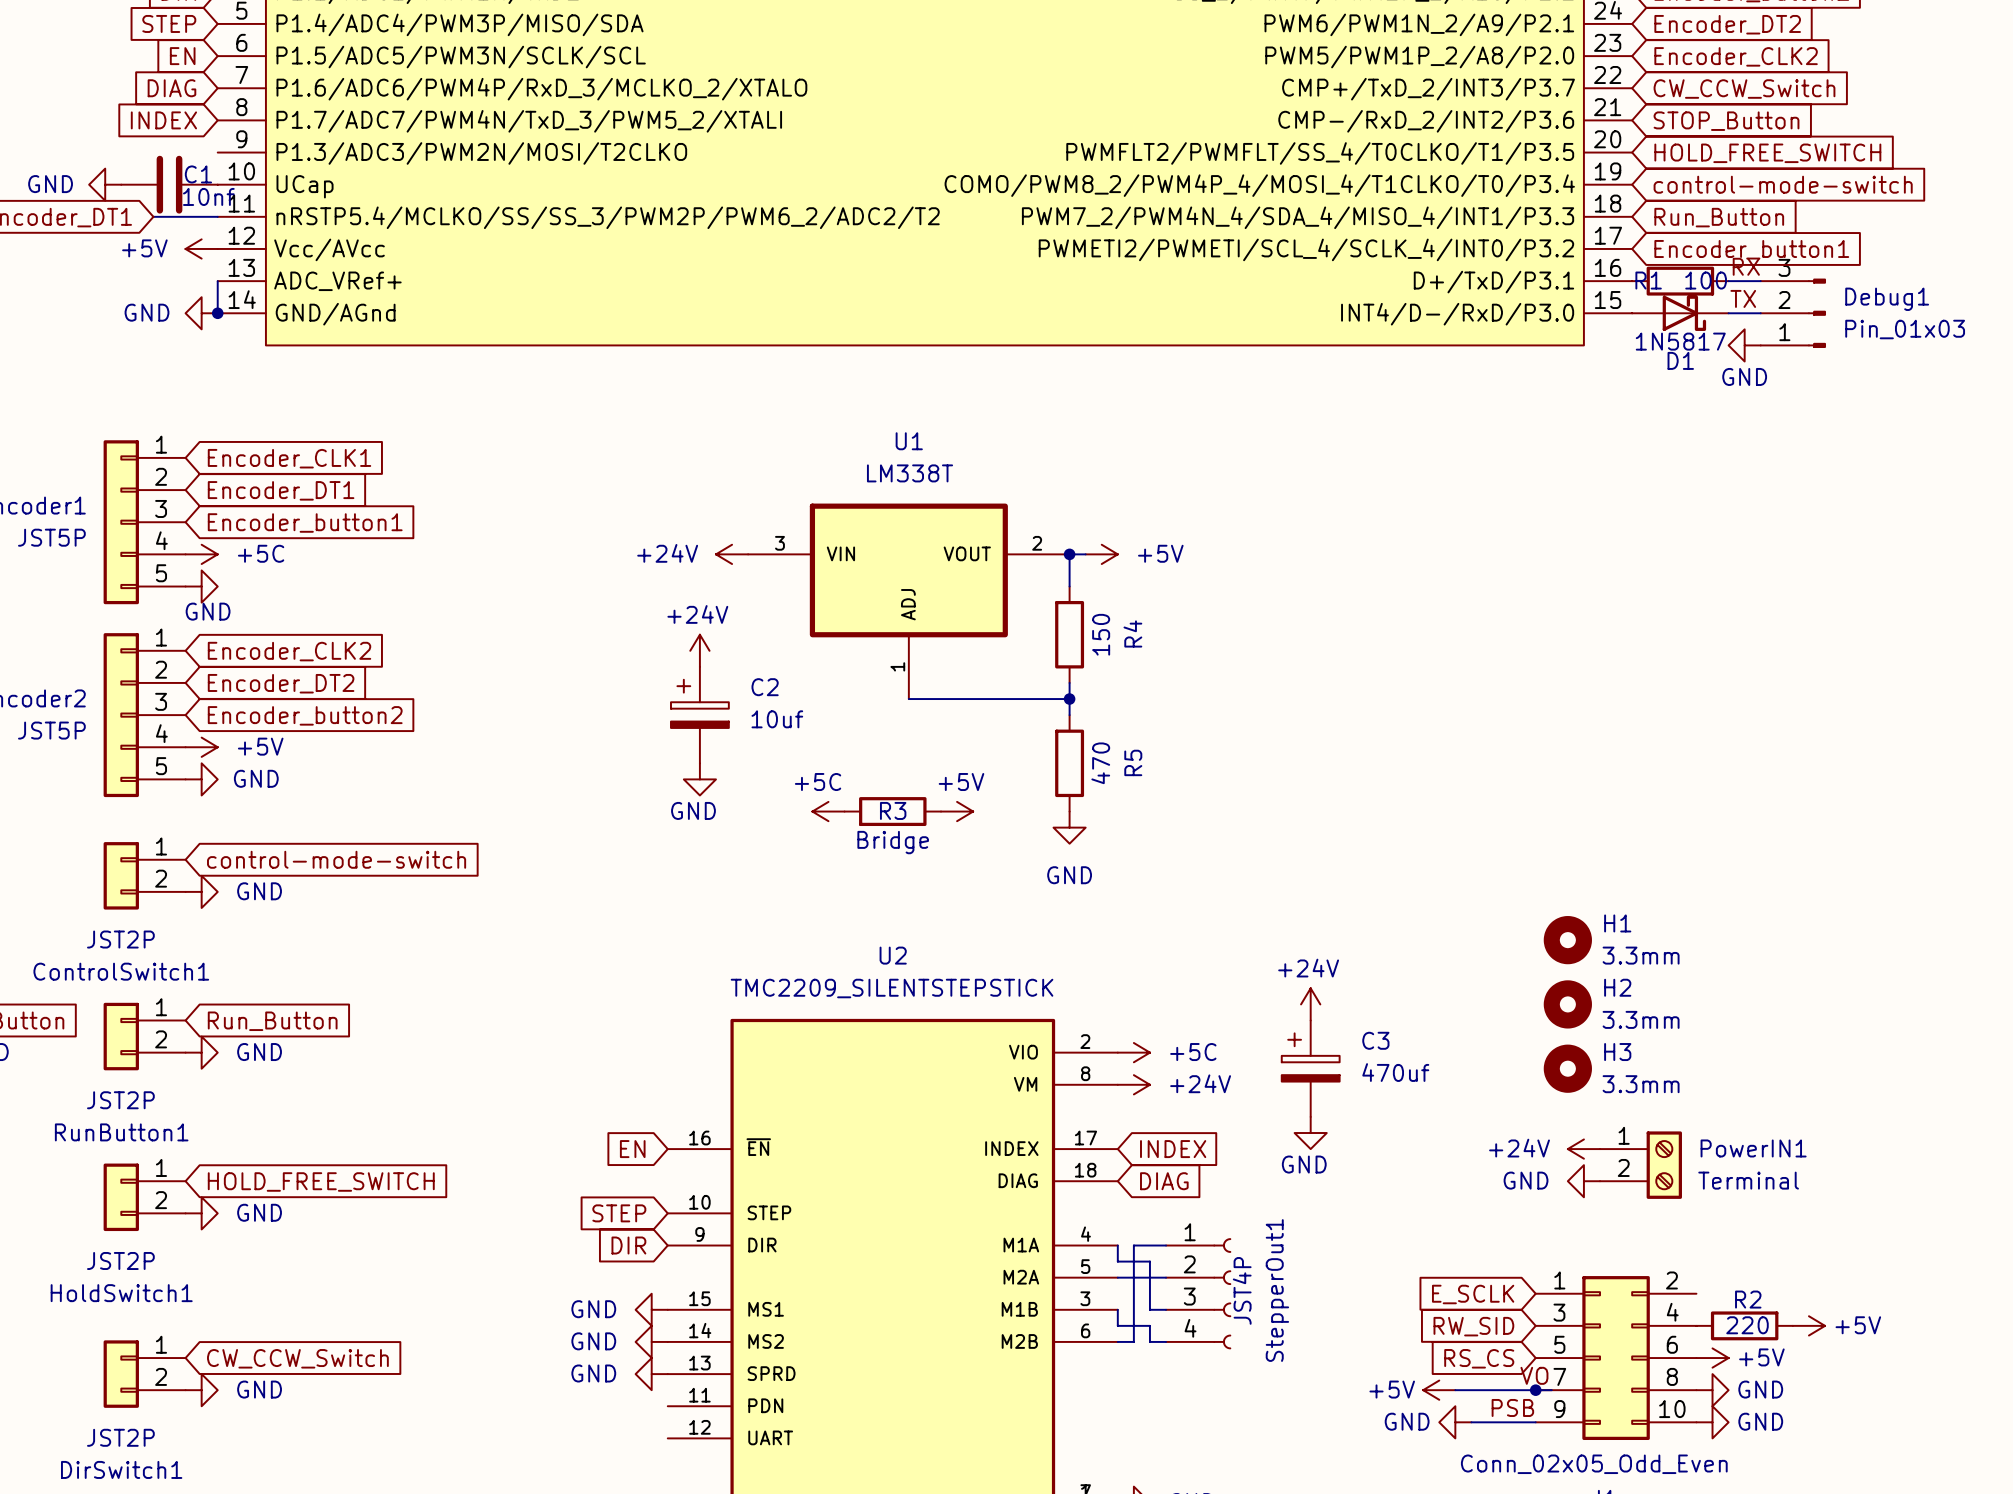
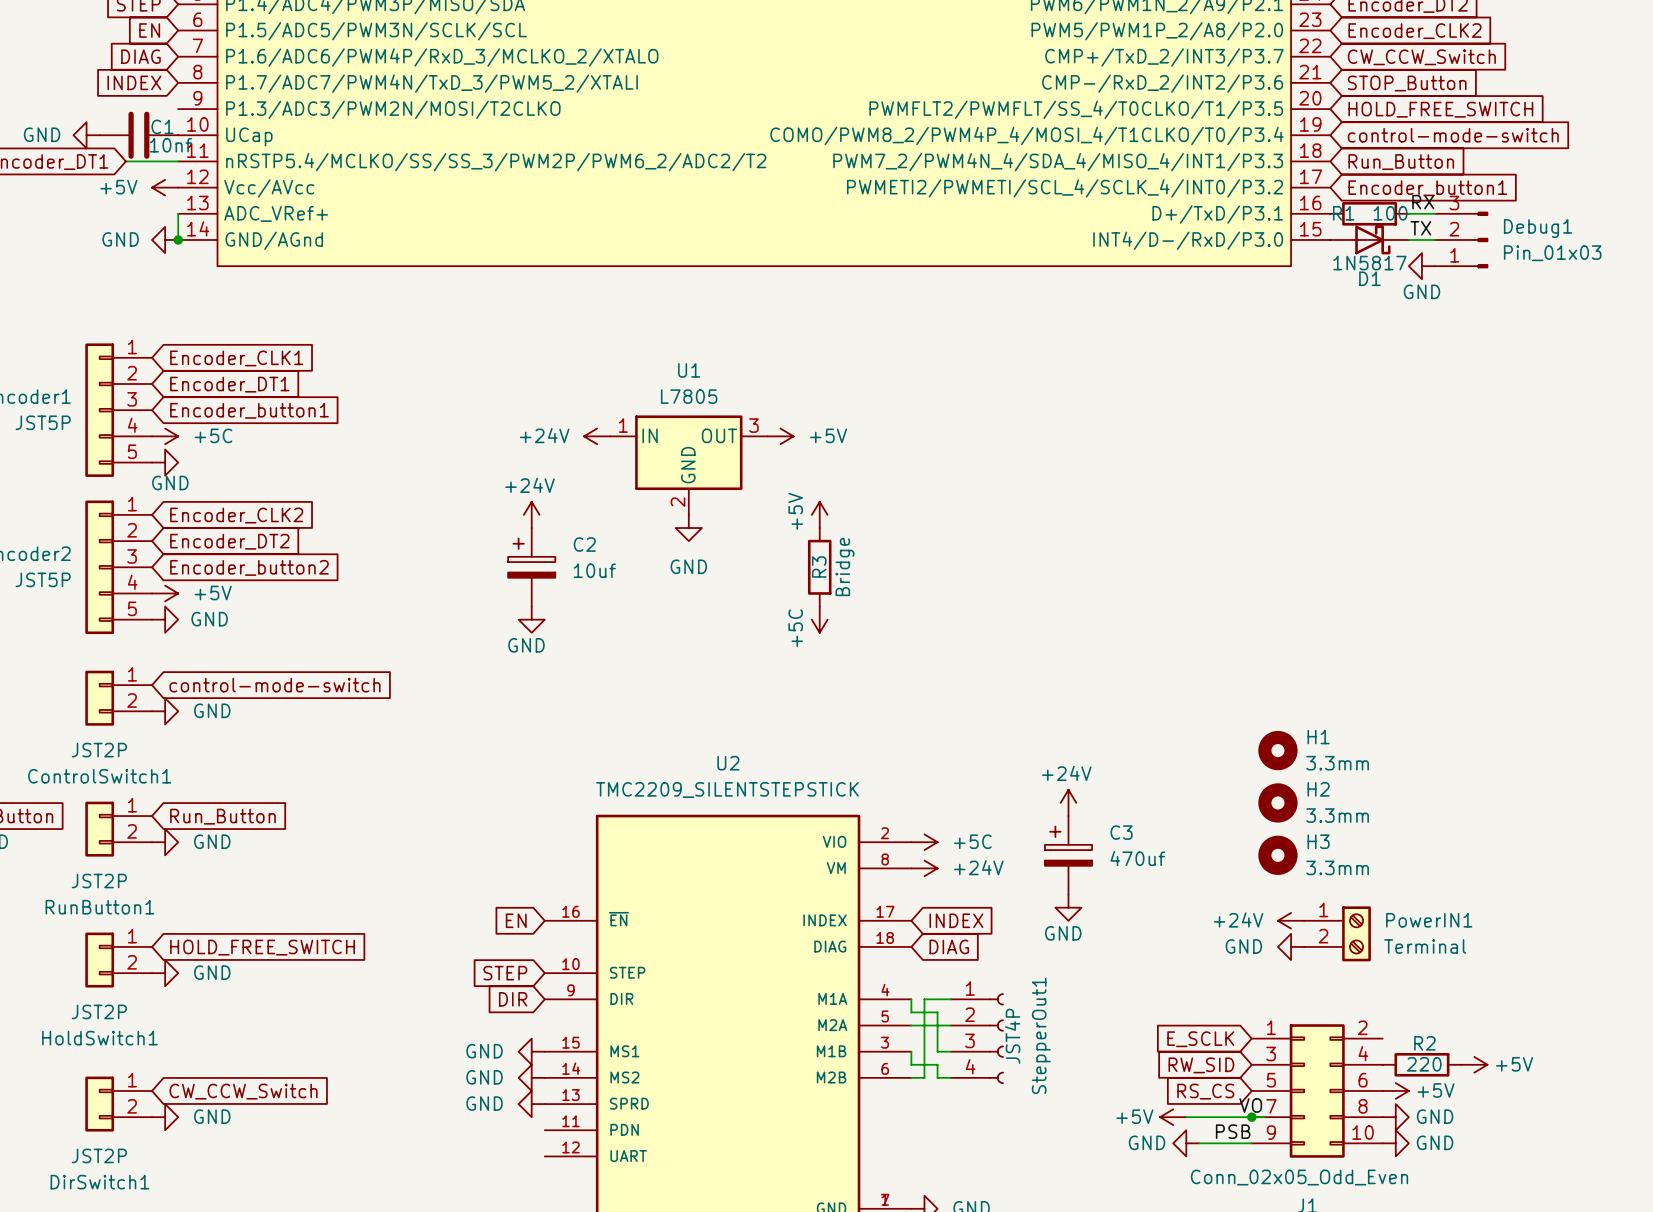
U1 name position: U1 (909, 441) -> U1 (689, 370)
U1 value: LM338T (910, 473) -> L7805 (689, 396)
U1 symbol: [748, 503, 1070, 700] -> [610, 415, 768, 515]
power symbol: none -> +5V (780, 436)
junction: (1069, 554) -> none
wire: (1085, 554) (1069, 554) (1069, 586) -> none
power symbol: +5V (1101, 554) -> none
R4: 150 (1069, 634) -> none
power symbol position: +24V (699, 650) -> +24V (531, 514)
power symbol: none -> +5V (819, 514)
power symbol: none -> GND (688, 528)
wire: (1069, 682) (1069, 715) -> none
wire: (908, 699) (1069, 699) -> none
junction: (1069, 699) -> none
C2 position: (699, 715) -> (531, 567)
R5: 470 (1069, 763) -> none
power symbol position: GND (699, 779) -> GND (531, 619)
power symbol rotation: 0° (828, 811) -> 90° counterclockwise (819, 619)
power symbol position: +5C (828, 811) -> +5C (819, 619)
R3 rotation: 0° (892, 811) -> 90° clockwise (819, 567)
R3 position: (892, 811) -> (819, 567)
power symbol: +5V (957, 811) -> none
power symbol: GND (1069, 827) -> none
R3 value position: Bridge (893, 842) -> Bridge (844, 566)

